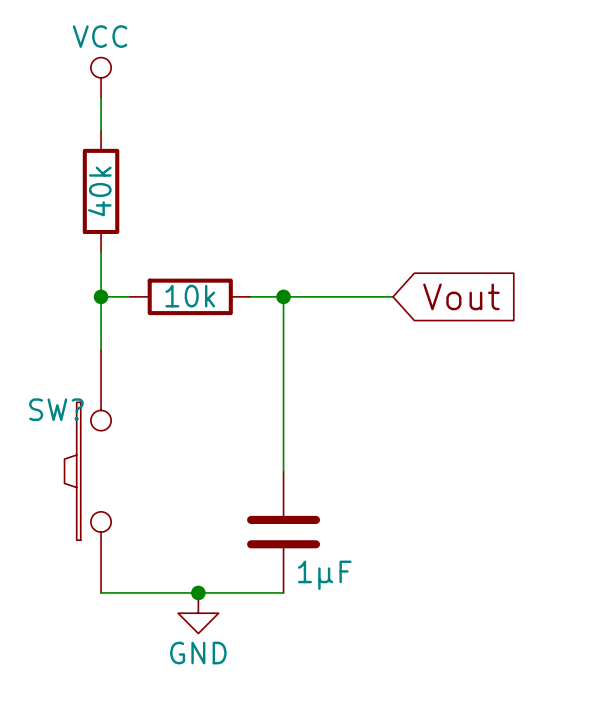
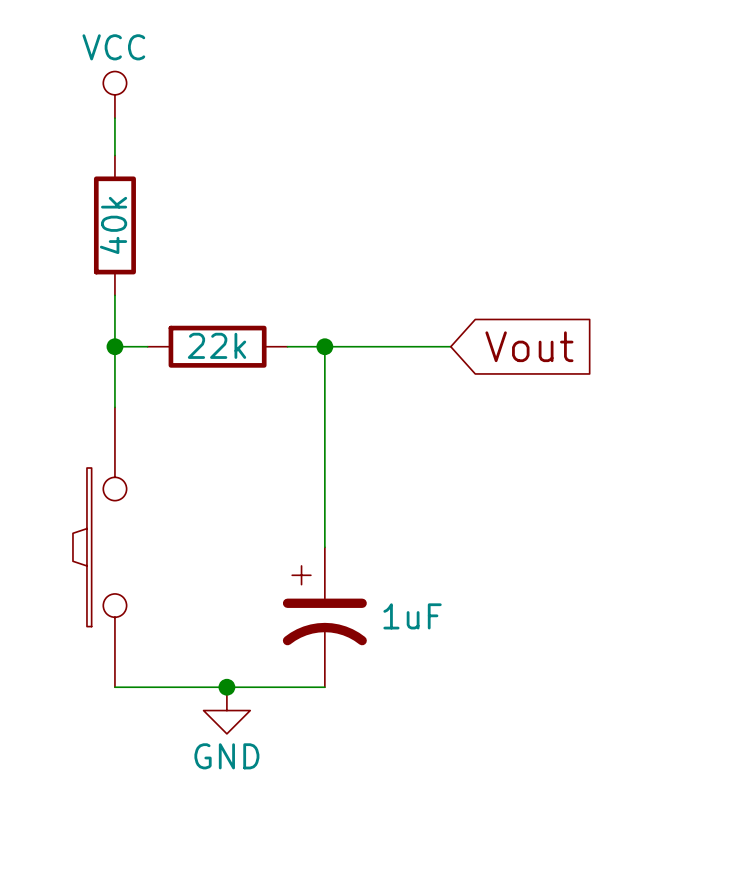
part value: 10k (190, 296) -> 22k (217, 345)
SW? name: SW? (56, 409) -> none
part symbol: [247, 471, 321, 593] -> [282, 547, 367, 688]
part value: 1µF (324, 575) -> 1uF (412, 616)

